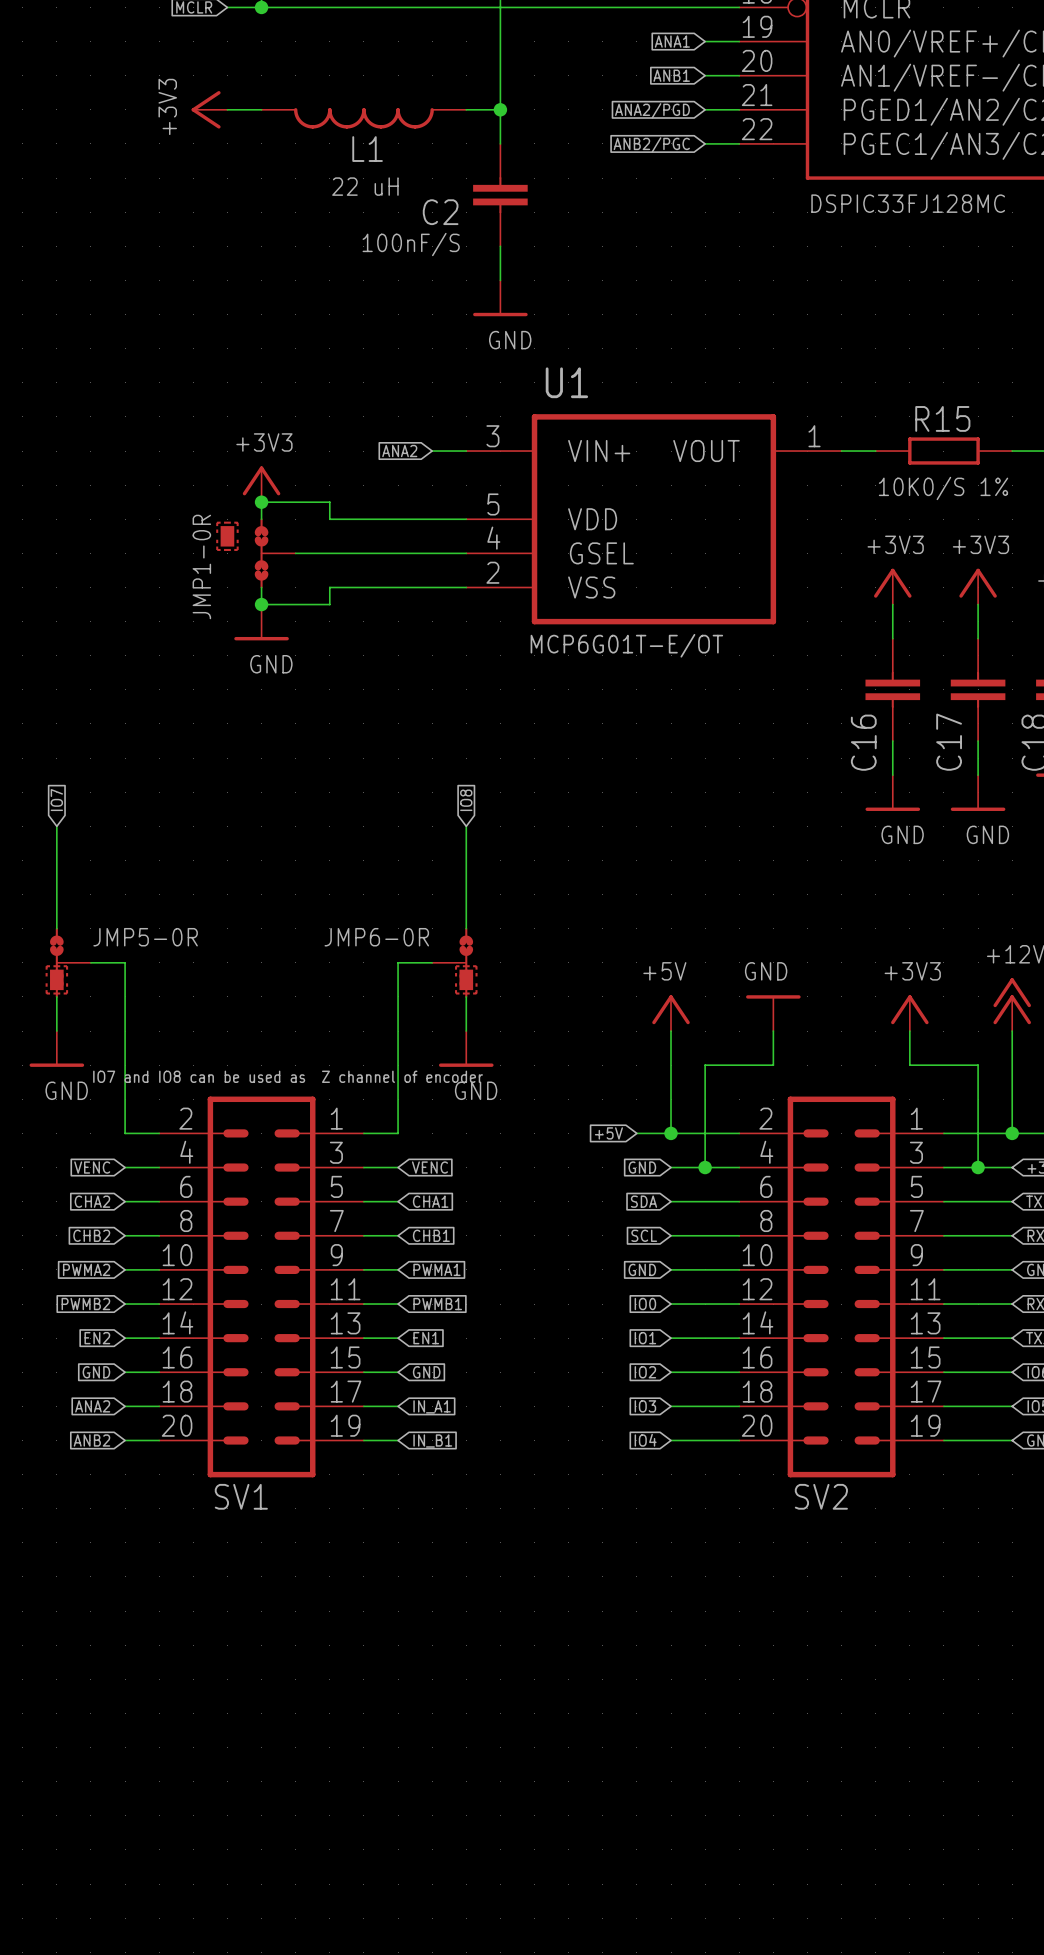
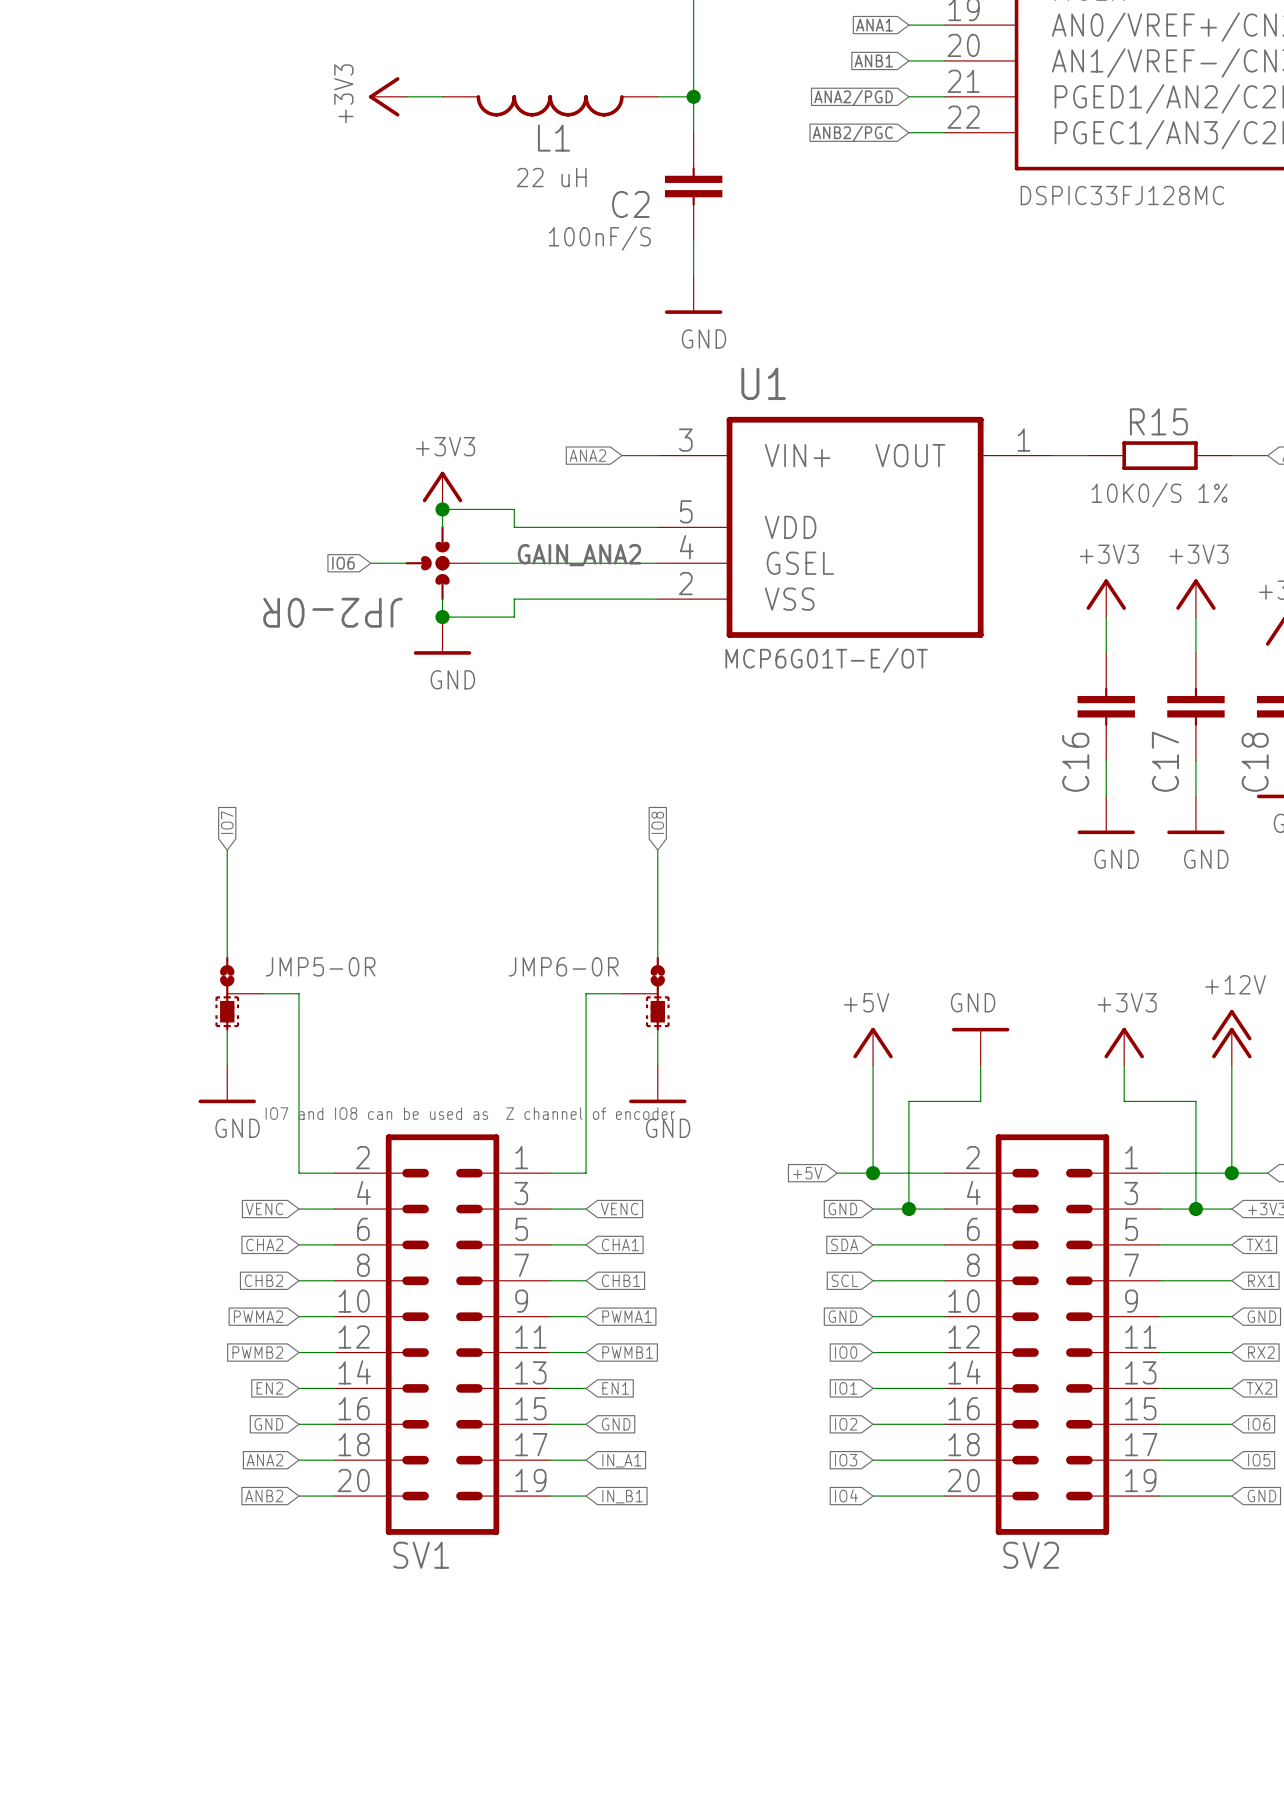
part: (227, 536) -> none
label: none -> GAIN_ANA2 (579, 555)
global label: none -> IO6 (343, 563)
wire: none -> (370, 563) (406, 563)
JP2-0R: none -> (441, 563)
JMP1-0R: (275, 553) -> none

